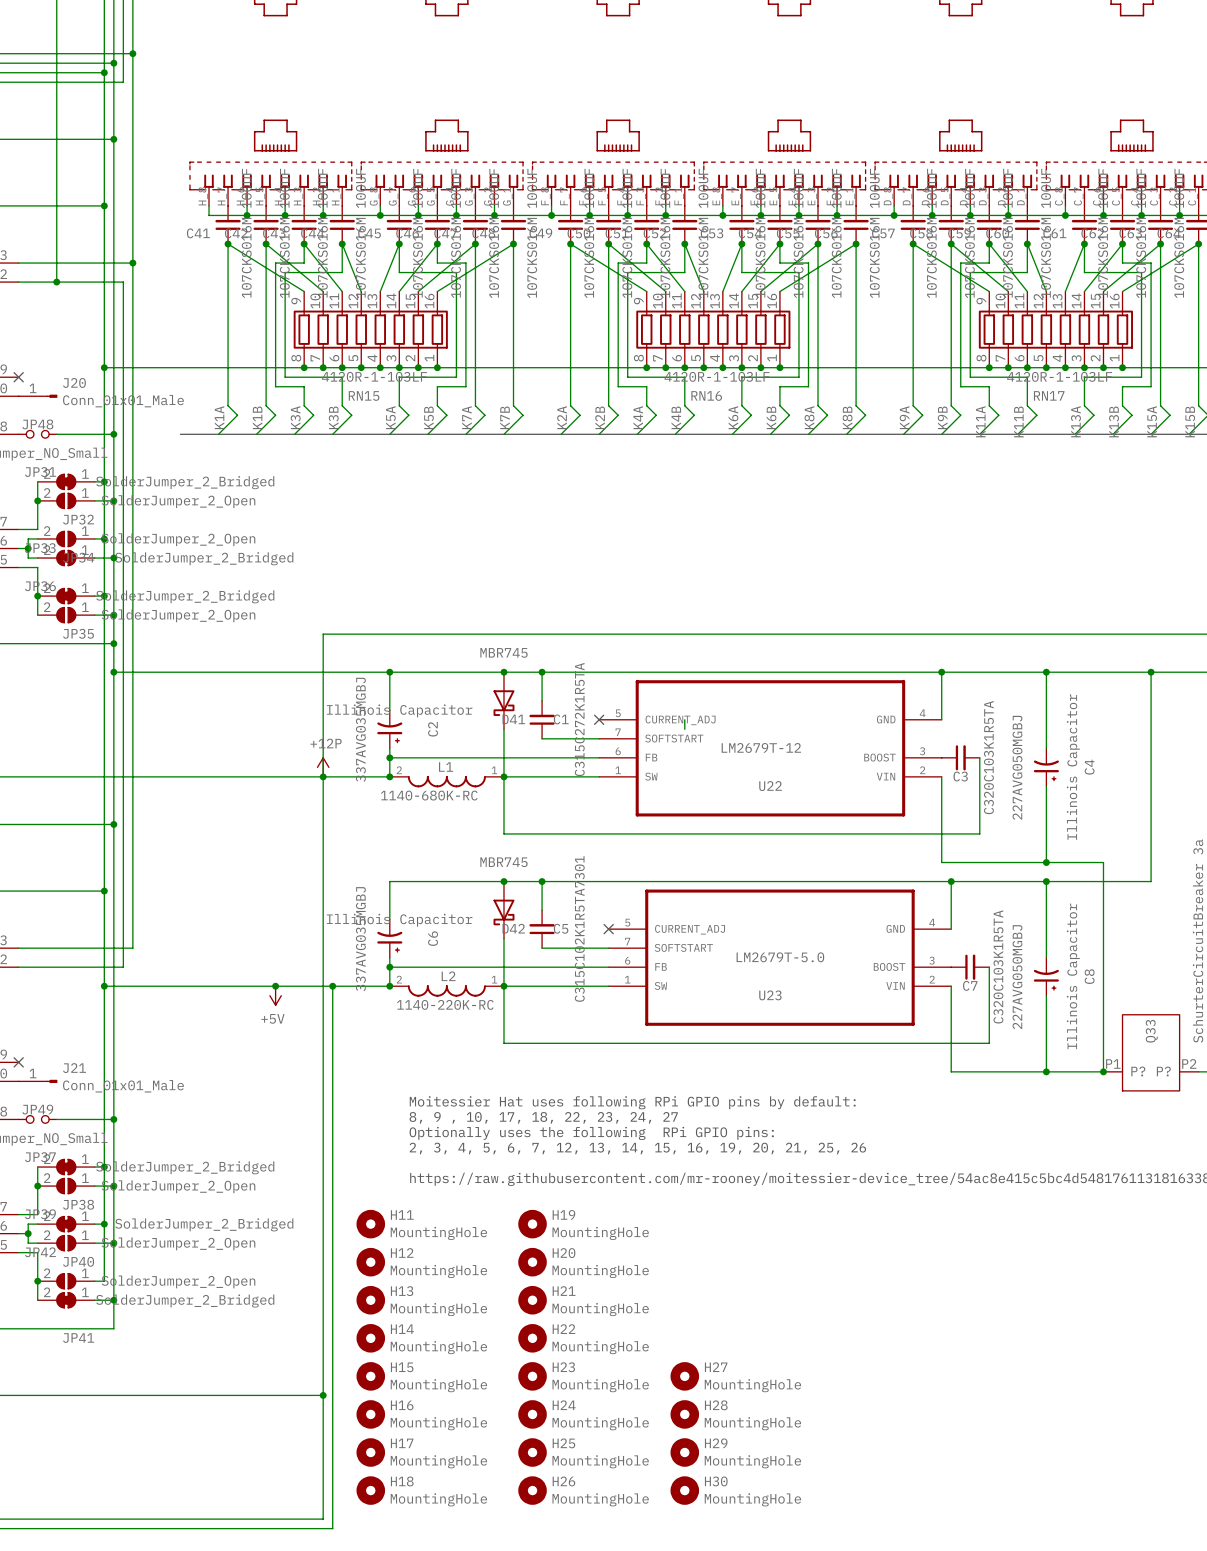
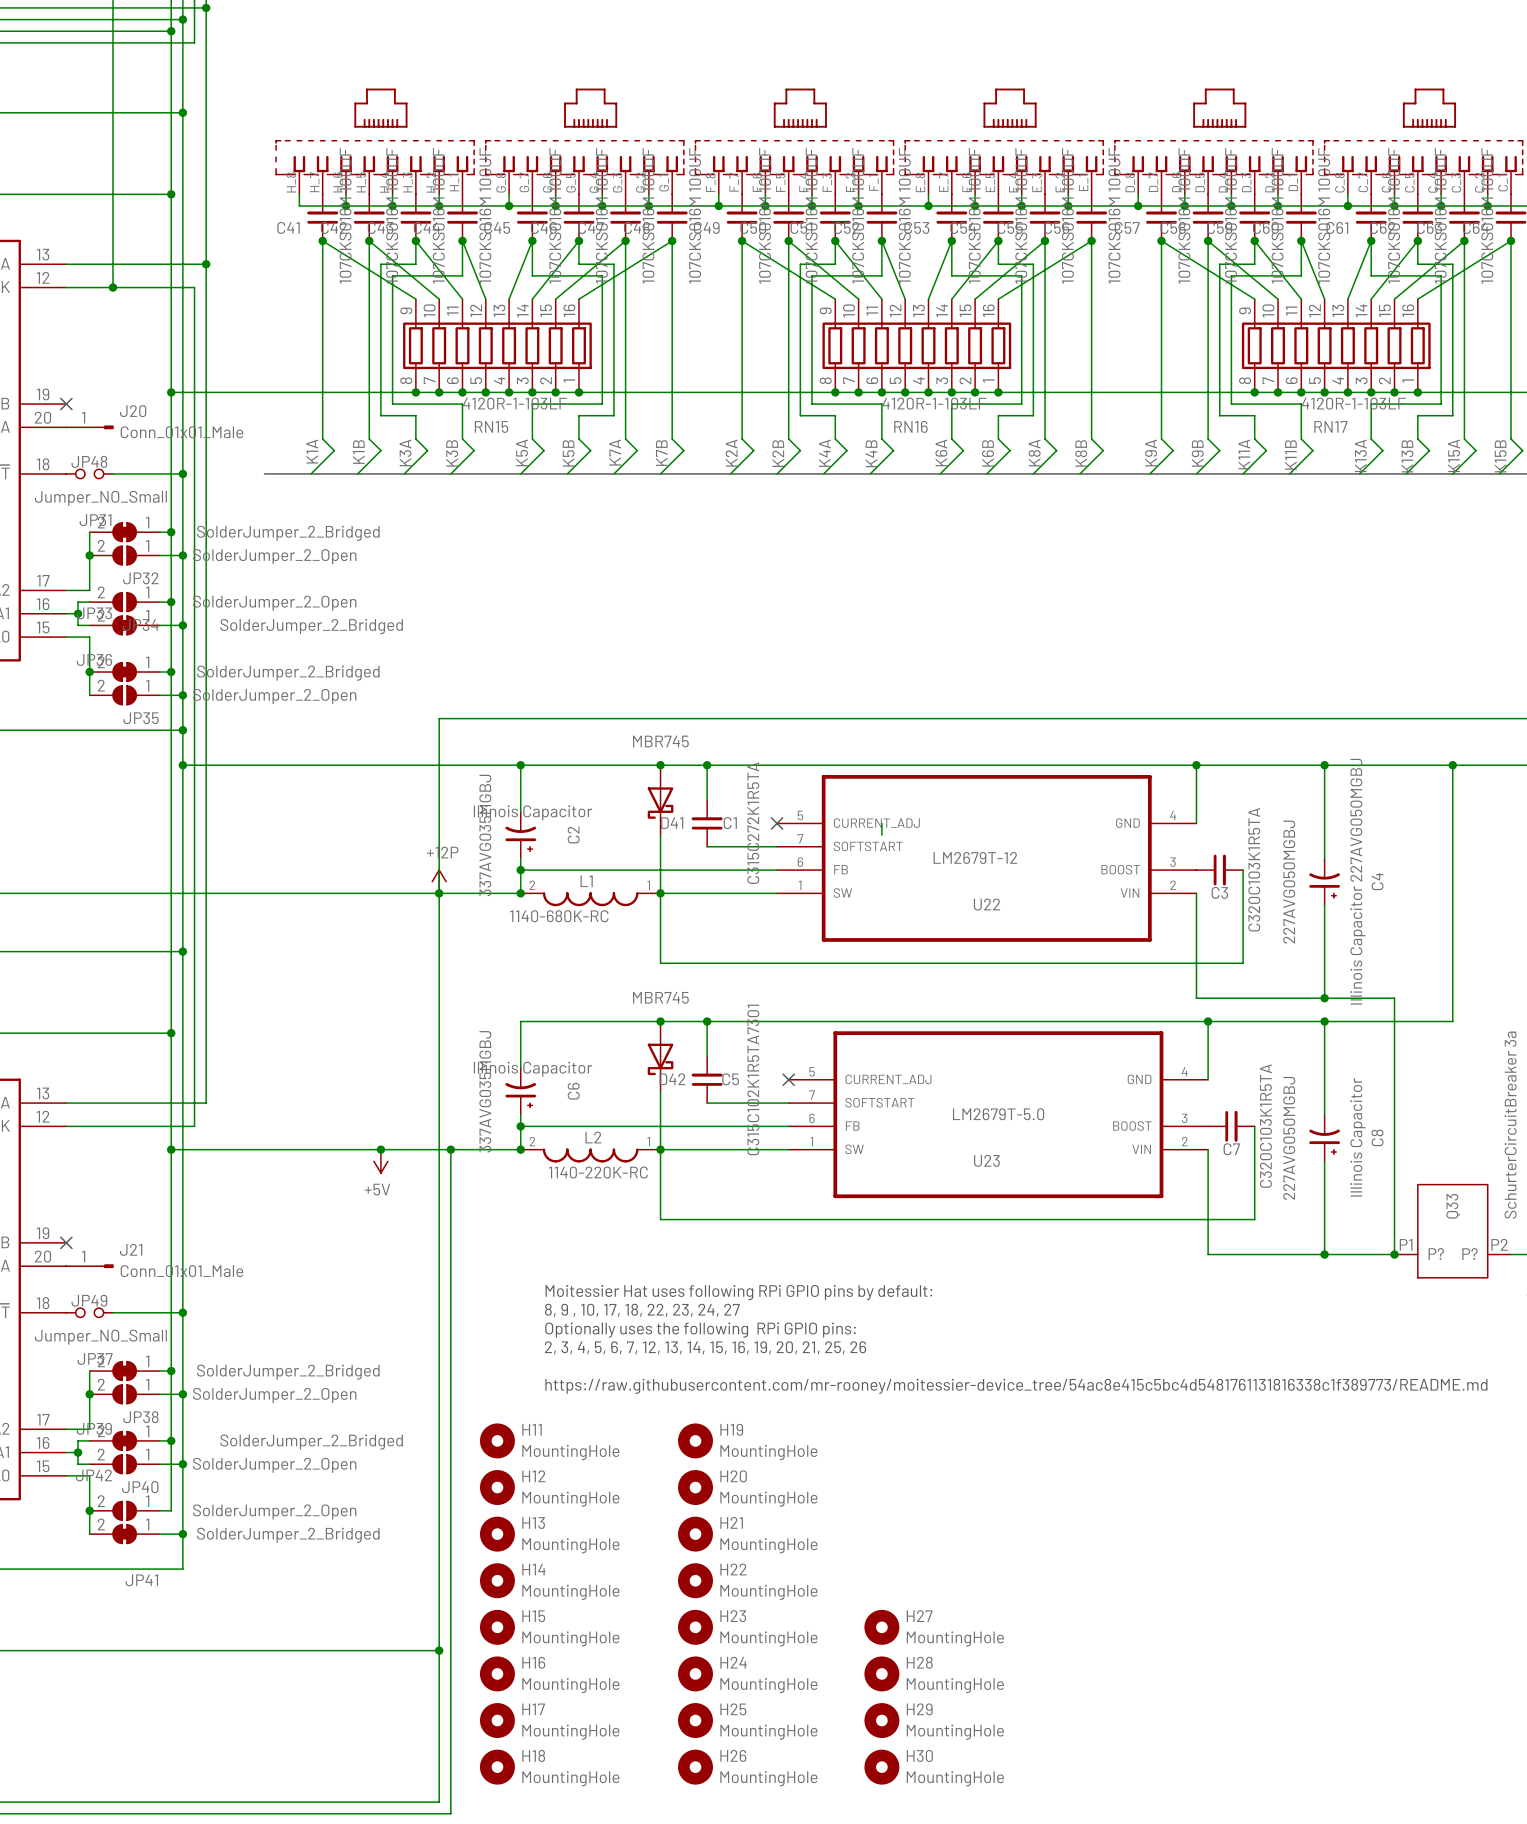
C4 value: Illinois Capacitor (1073, 767) -> Illinois Capacitor 227AVG050MGBJ (1357, 881)

